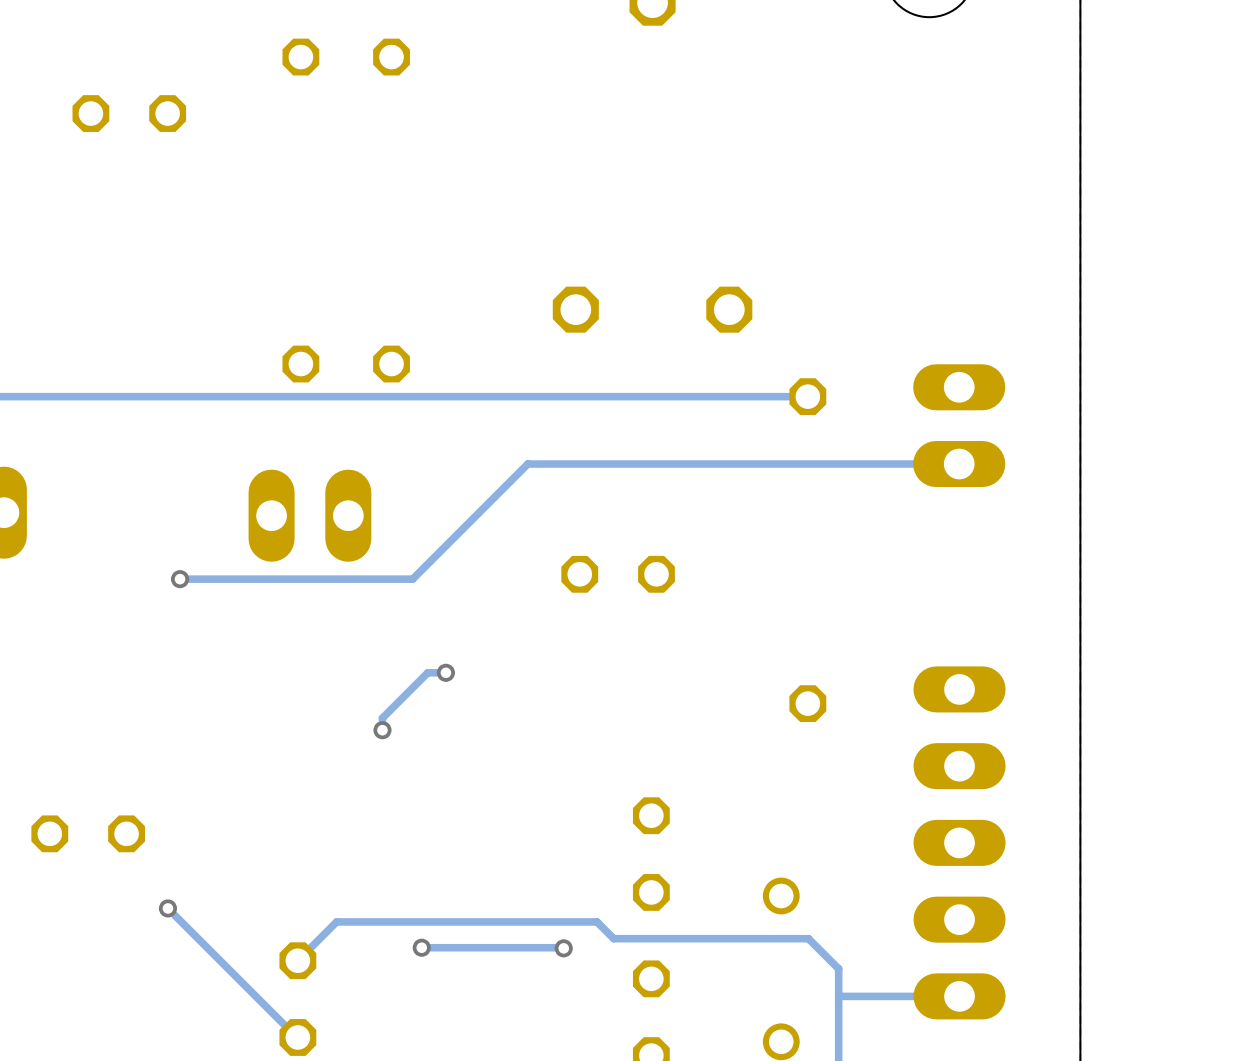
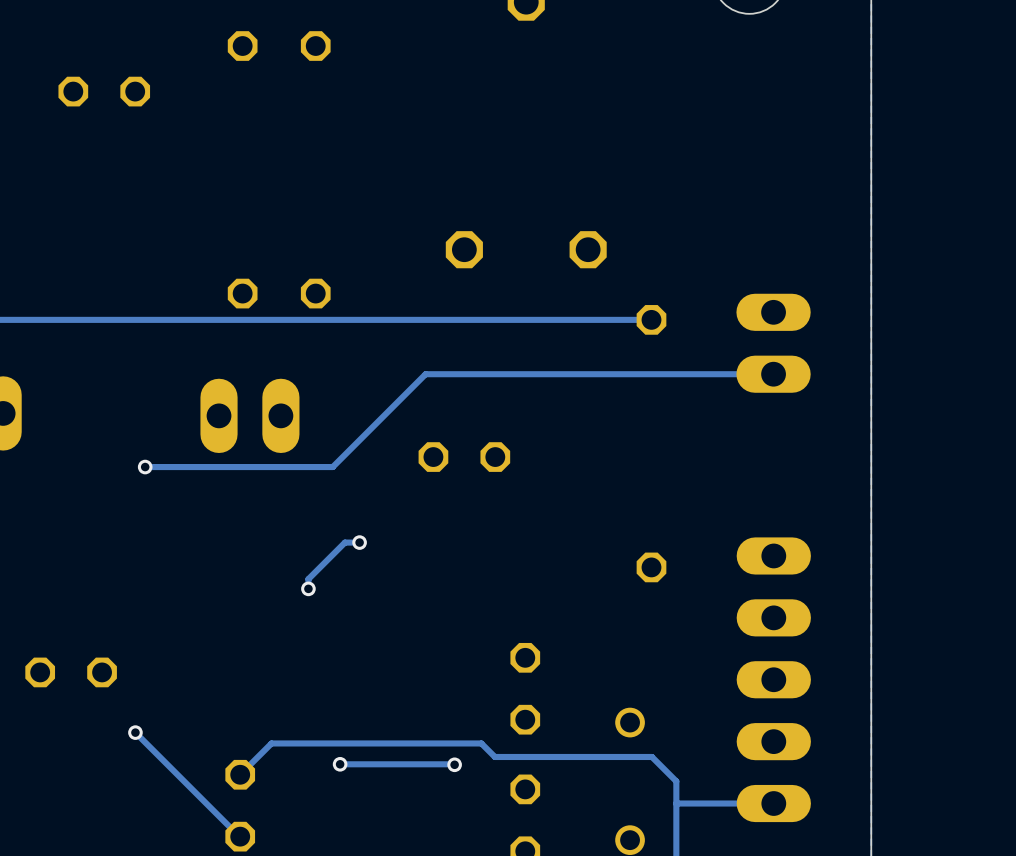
part position: (618, 574) -> (464, 457)

